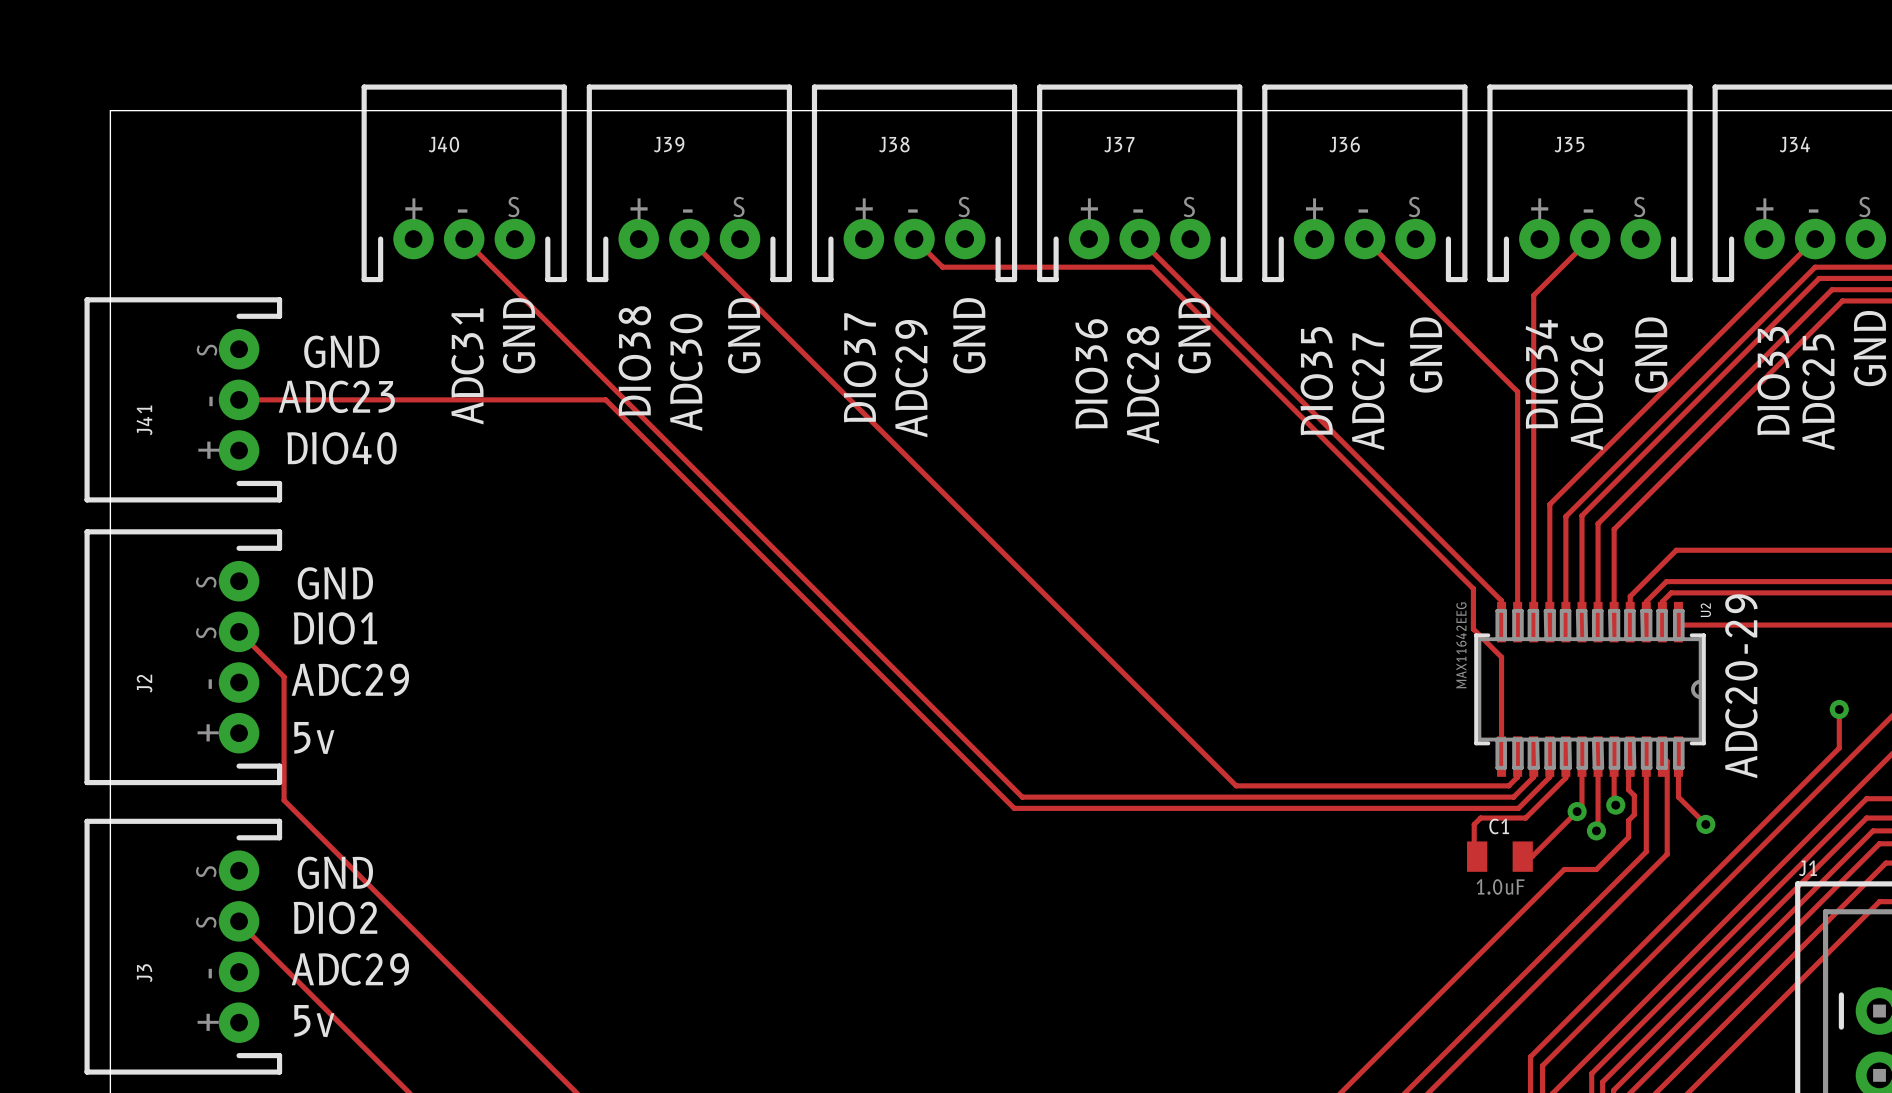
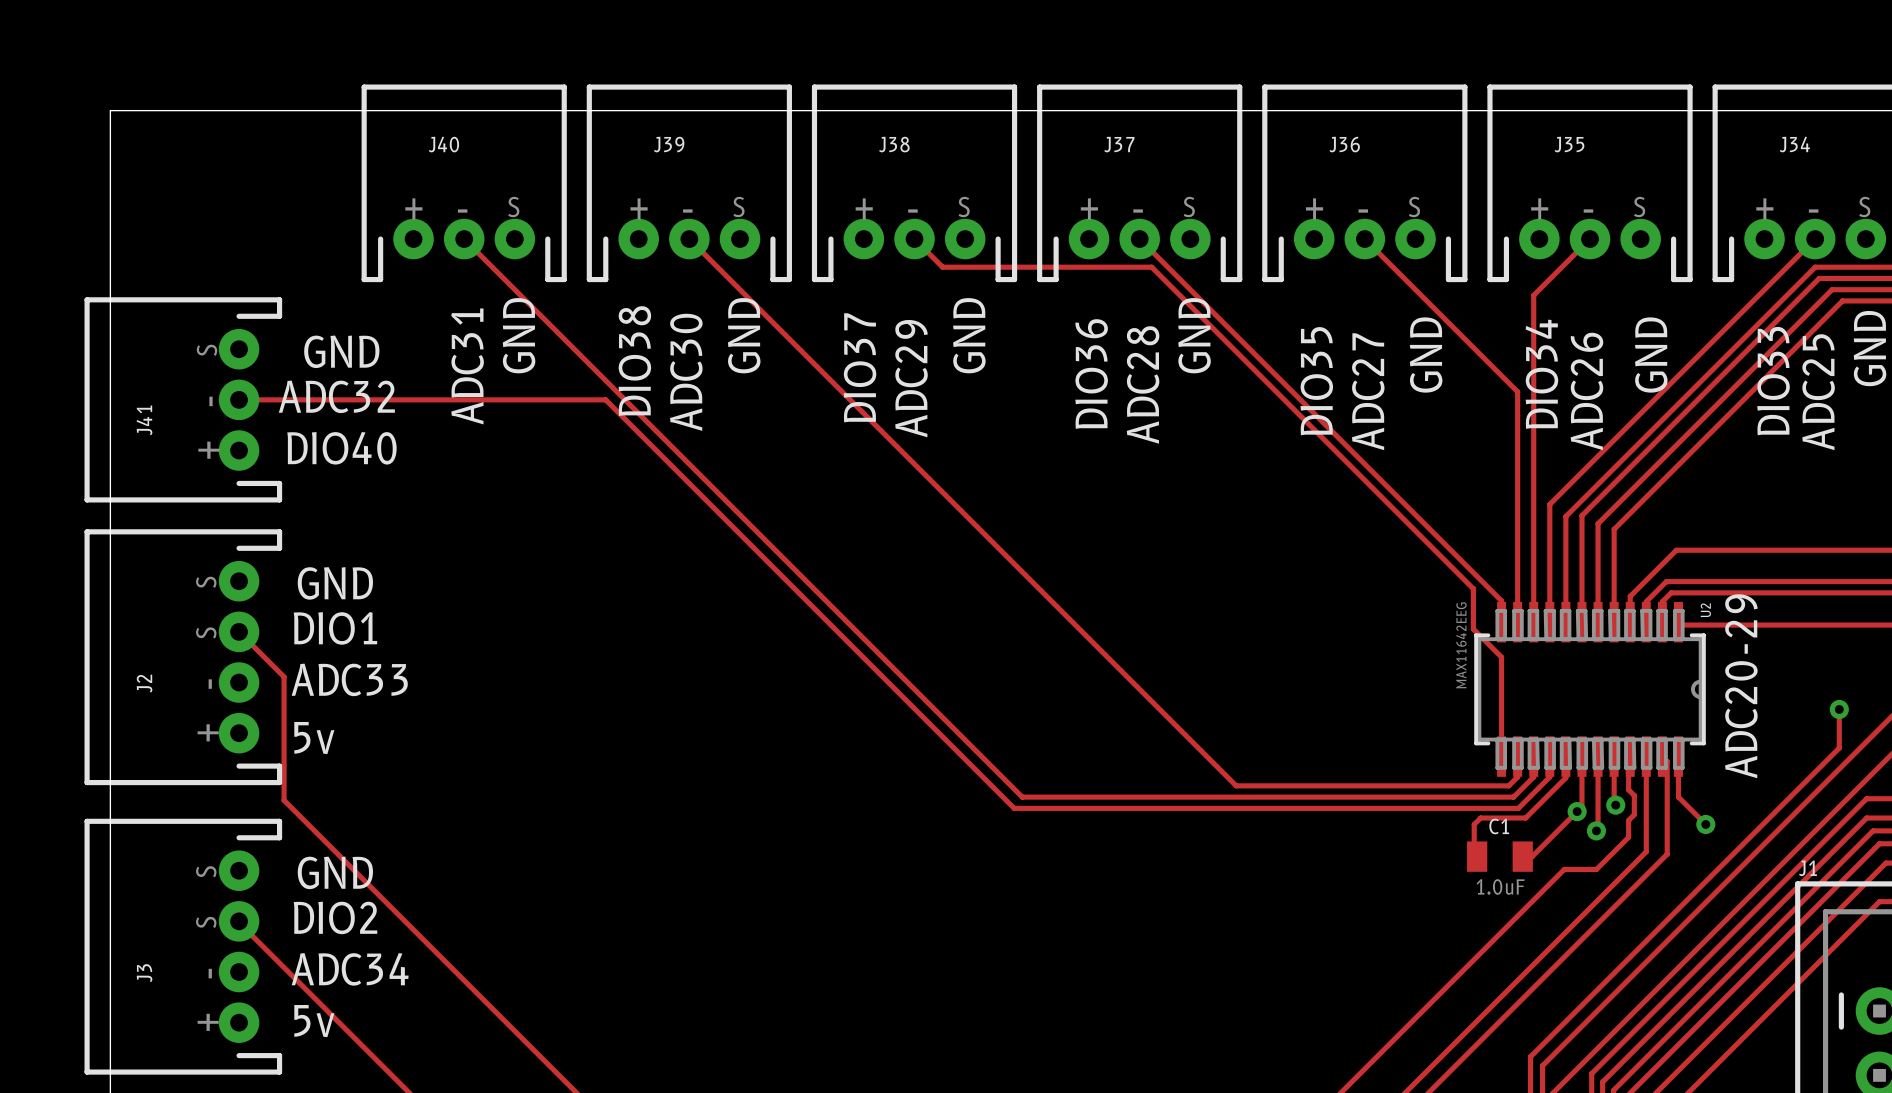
text: ADC23 (336, 396) -> ADC32 (336, 396)
text: ADC29 (350, 679) -> ADC33 (349, 679)
text: ADC29 (350, 969) -> ADC34 (350, 969)

